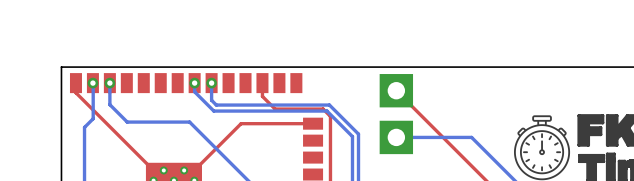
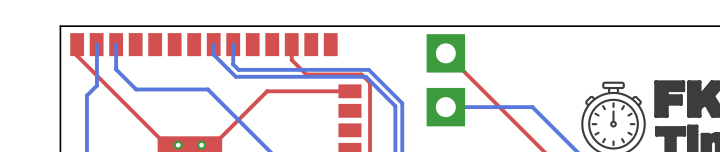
via: (92, 83) -> none
via: (109, 83) -> none
via: (194, 83) -> none
via: (211, 83) -> none

